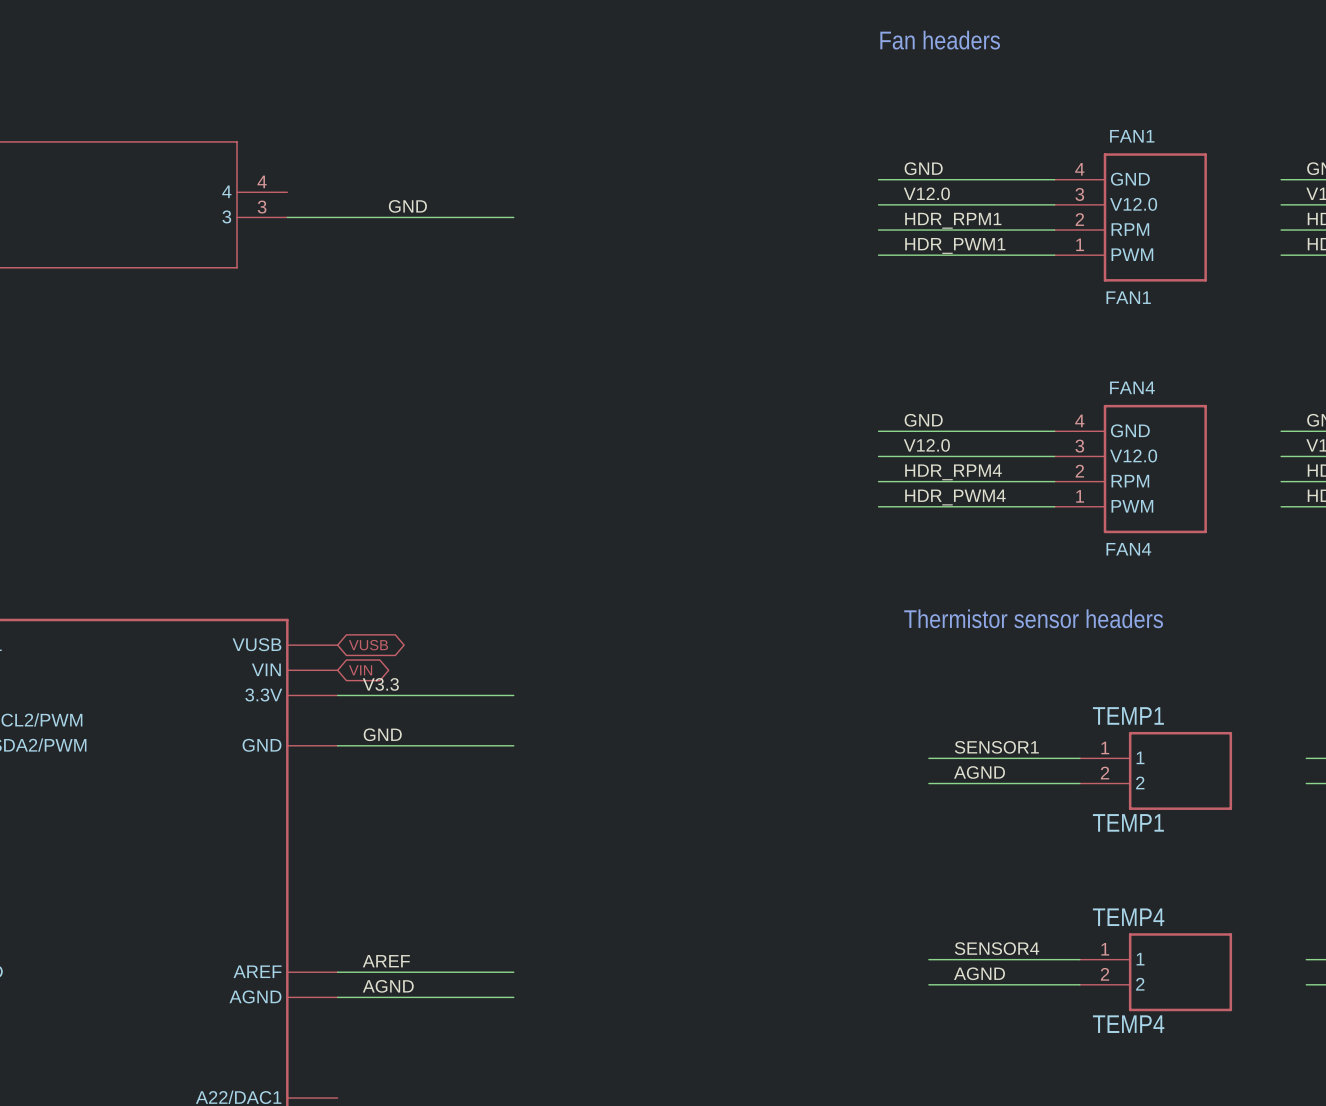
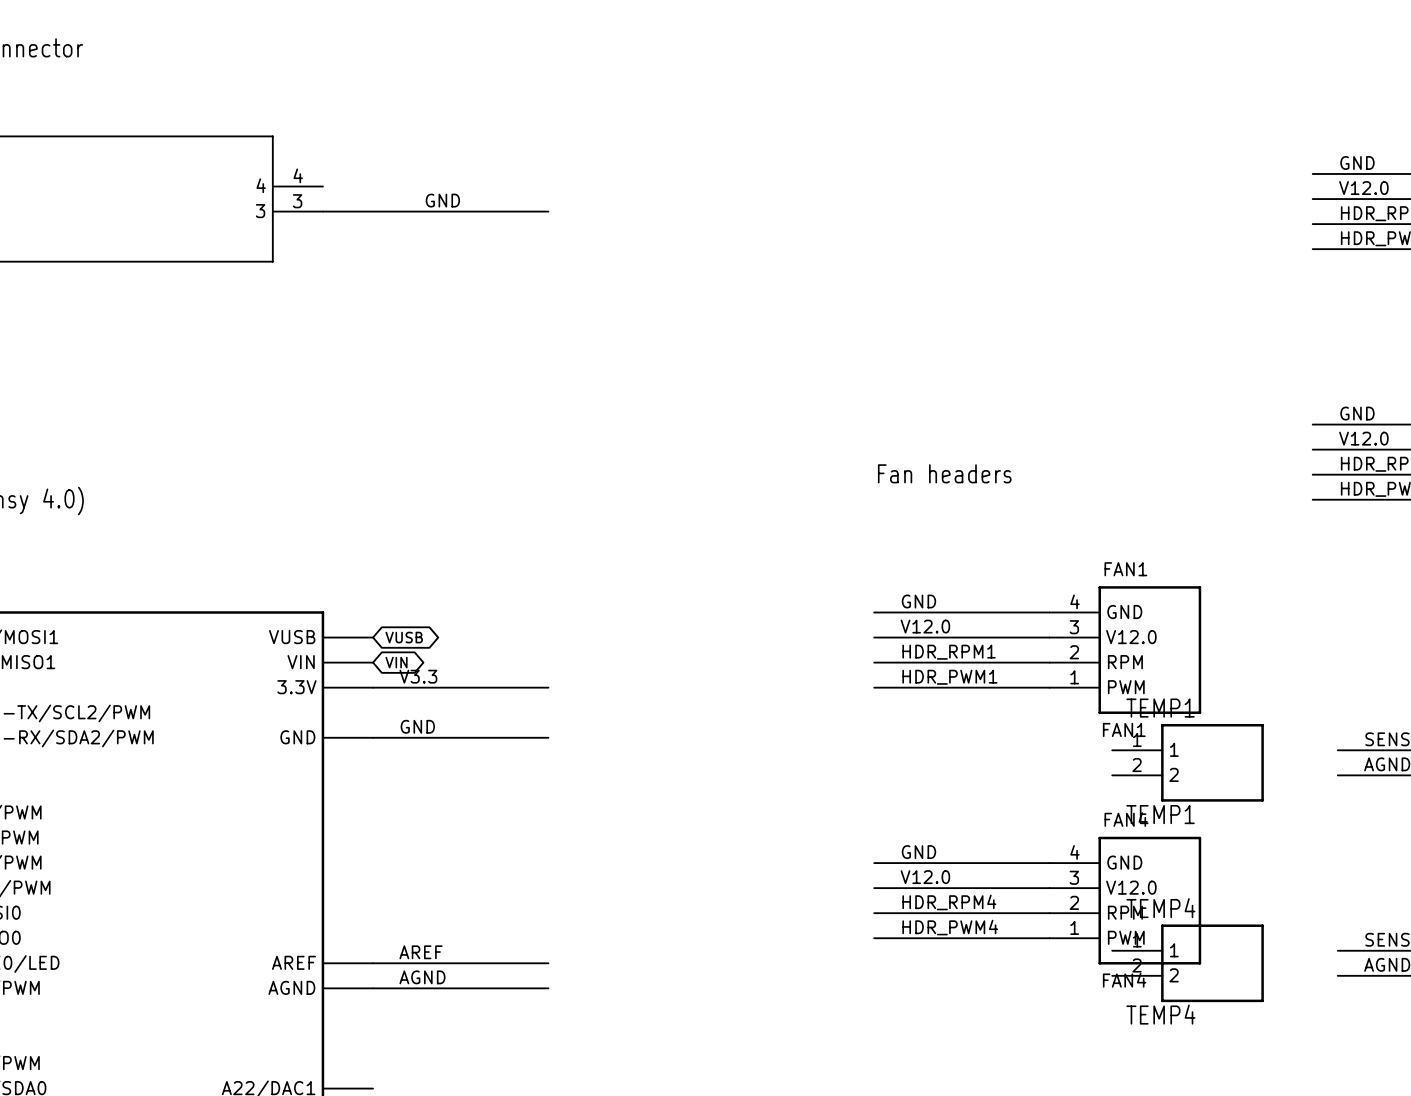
text: Fan headers (940, 40) -> none
label: GND (923, 168) -> none
wire: (878, 179) (1054, 179) -> none
label: V12.0 (926, 193) -> none
wire: (878, 204) (1054, 204) -> none
FAN1 position: (1130, 217) -> (1125, 650)
label: HDR_RPM1 (953, 220) -> none
wire: (878, 230) (1054, 230) -> none
label: HDR_PWM1 (955, 245) -> none
wire: (878, 255) (1054, 255) -> none
label position: GND (923, 420) -> GND (918, 601)
wire: (878, 431) (1054, 431) -> (874, 612) (1049, 612)
label position: V12.0 (926, 445) -> V12.0 (925, 626)
wire: (878, 456) (1054, 456) -> (874, 637) (1049, 637)
FAN4 position: (1130, 469) -> (1125, 900)
label: HDR_RPM4 (953, 472) -> none
text: none -> Fan headers (944, 473)
wire: (878, 481) (1054, 481) -> (874, 662) (1049, 662)
label: HDR_PWM4 (955, 497) -> none
wire: (878, 506) (1054, 506) -> (874, 687) (1049, 687)
text: Thermistor sensor headers (1033, 618) -> none
label: none -> HDR_RPM1 (949, 652)
label: none -> HDR_PWM1 (949, 677)
label: SENSOR1 (996, 747) -> none
wire: (928, 758) (1079, 758) -> none
label: AGND (979, 772) -> none
wire: (928, 783) (1079, 783) -> none
label: none -> GND (918, 852)
wire: none -> (874, 863) (1049, 863)
label: none -> V12.0 (925, 877)
wire: none -> (874, 888) (1049, 888)
label: none -> HDR_RPM4 (949, 902)
wire: none -> (874, 913) (1049, 913)
label: none -> HDR_PWM4 (950, 927)
wire: none -> (874, 938) (1049, 938)
label: SENSOR4 (997, 948) -> none
wire: (928, 959) (1079, 959) -> none
label: AGND (979, 973) -> none
wire: (928, 984) (1079, 984) -> none

